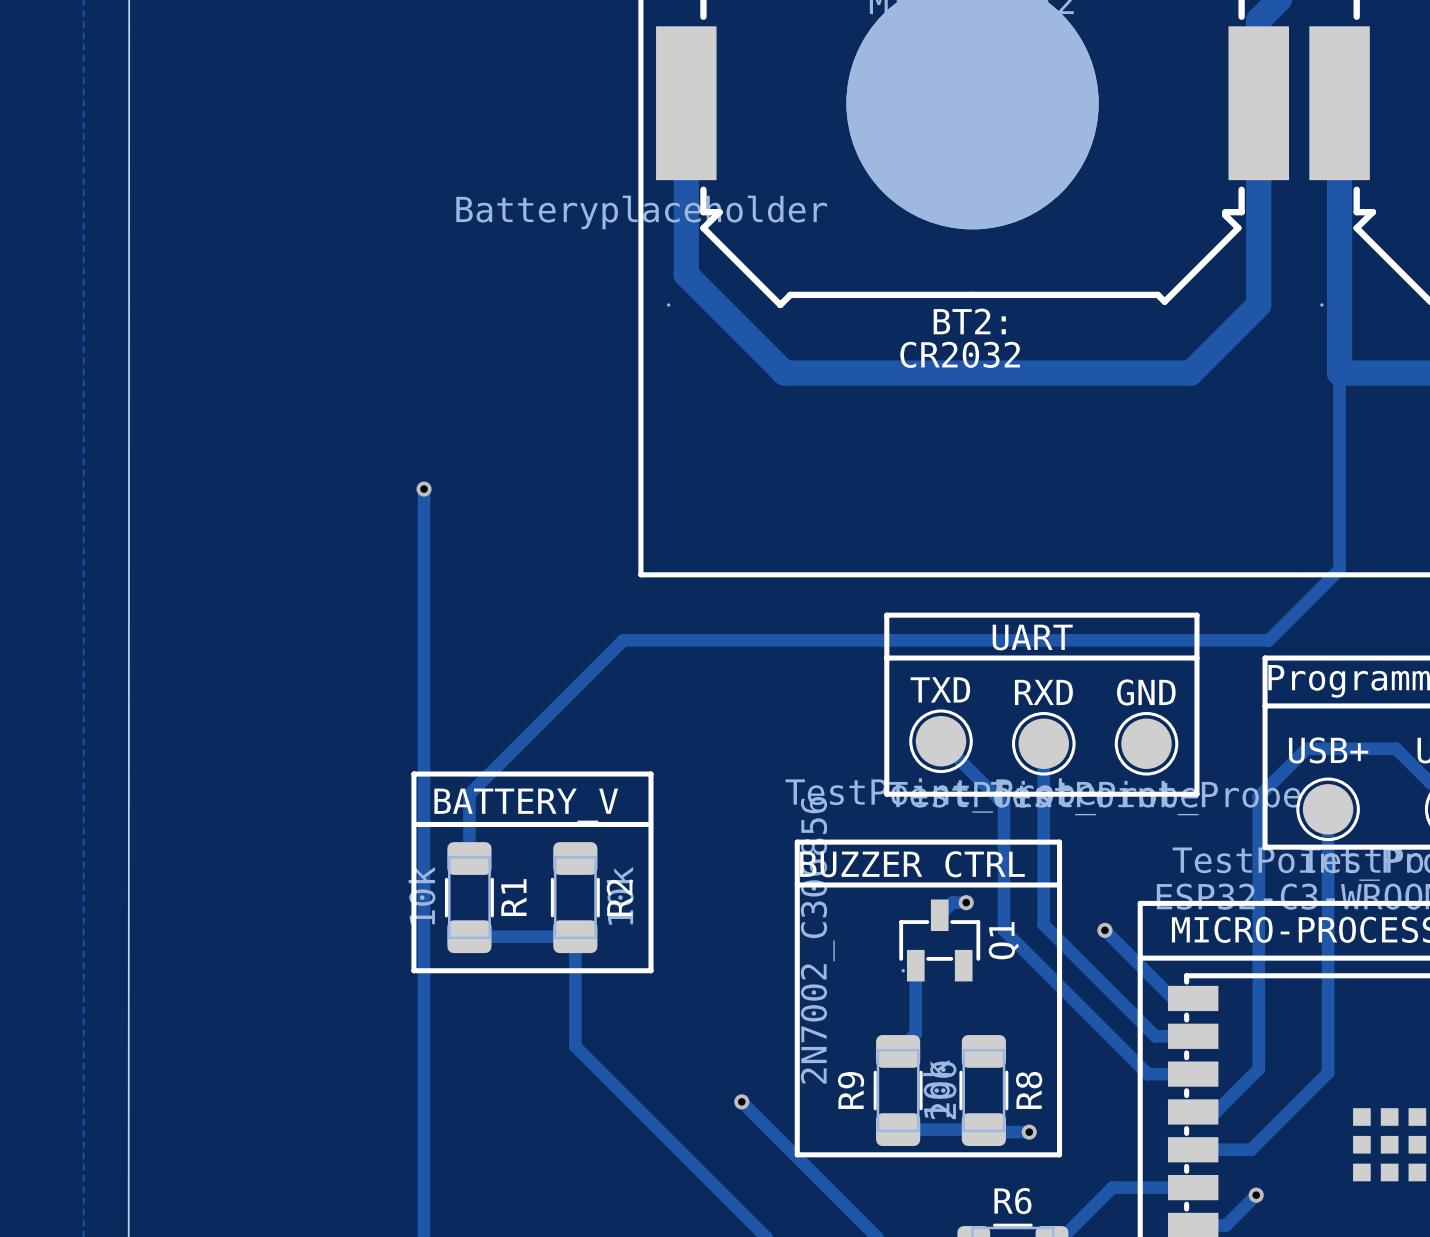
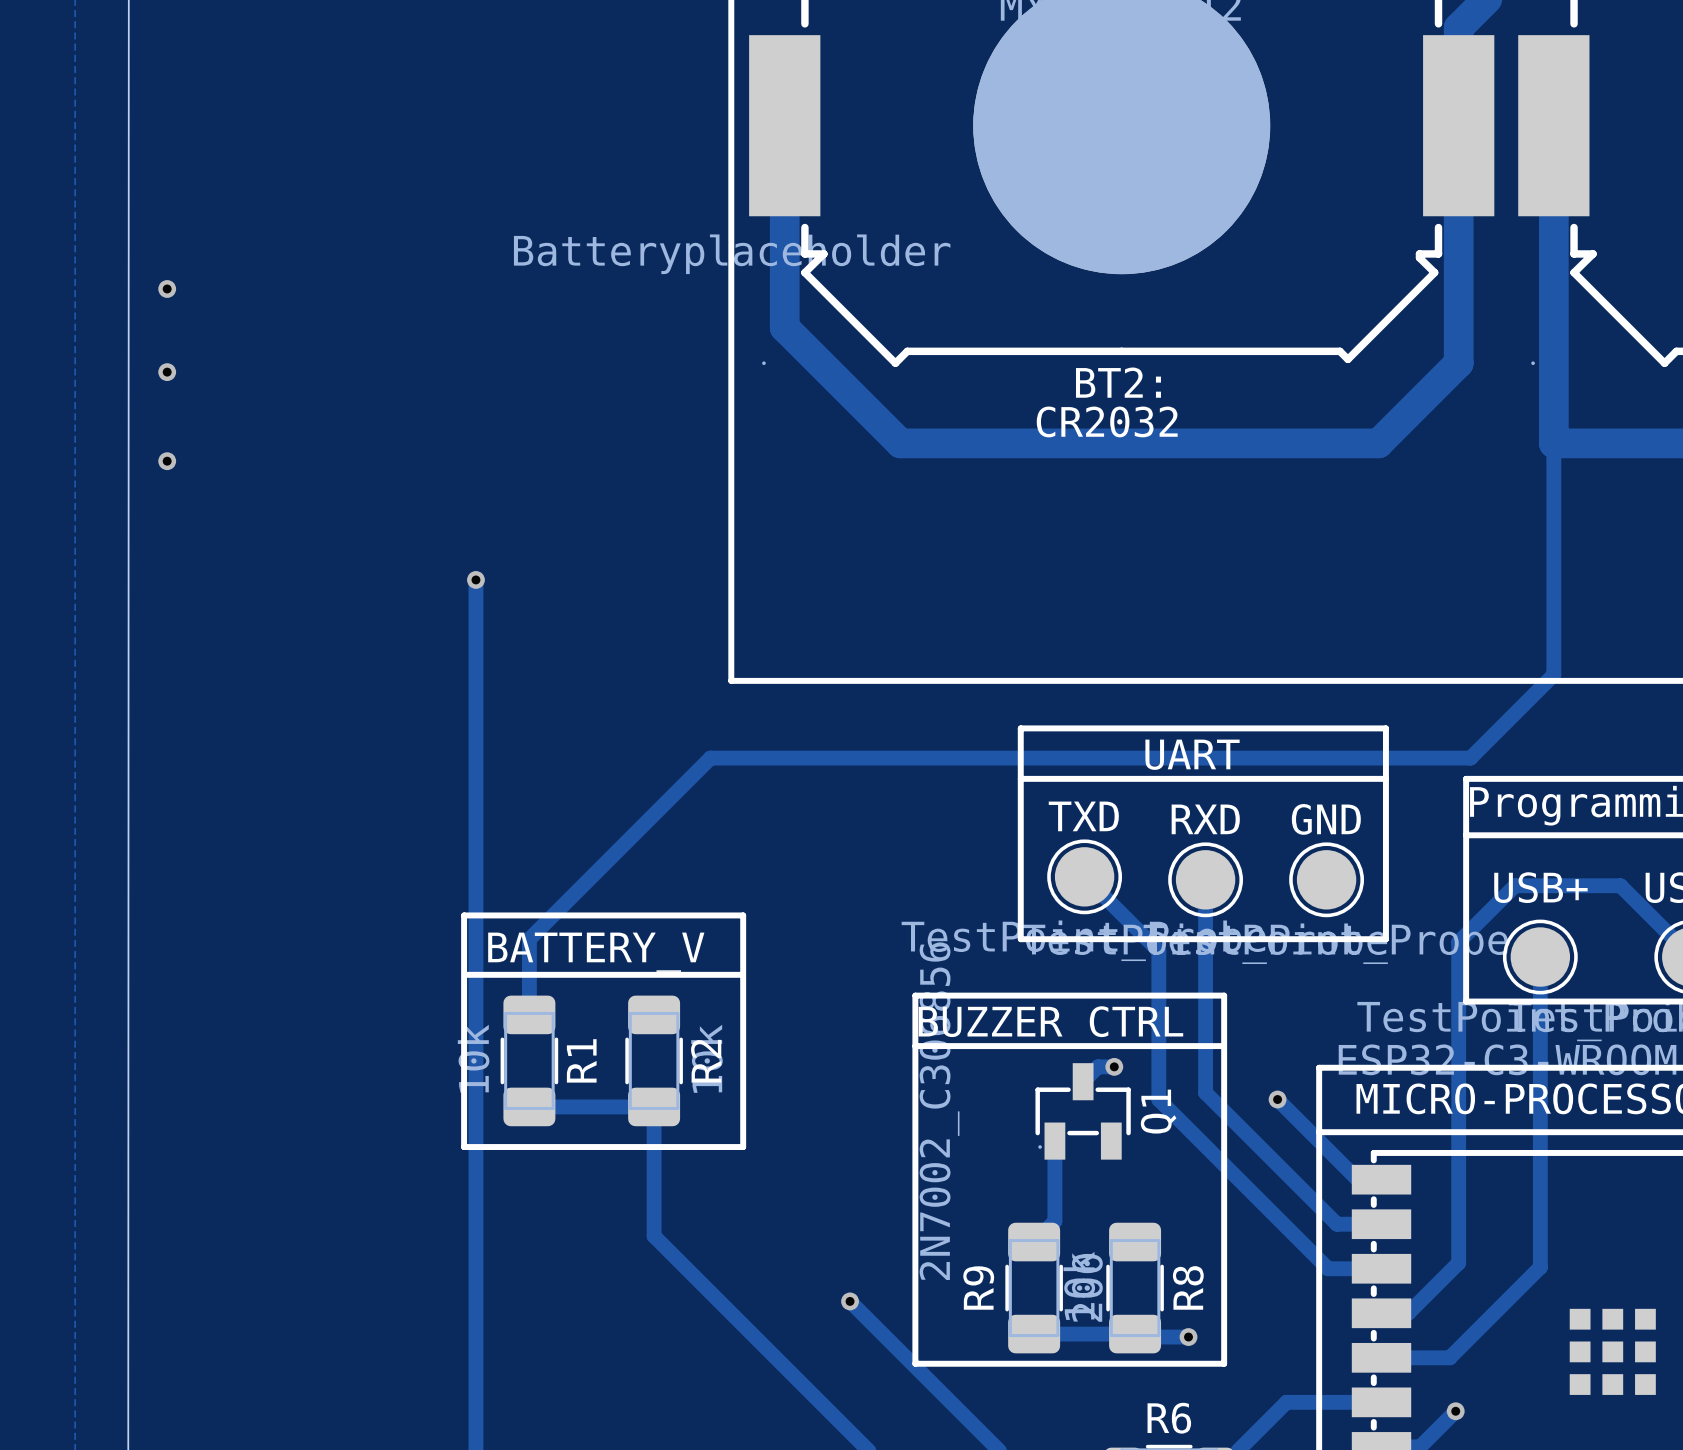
via: none -> (167, 288)
via: none -> (167, 372)
via: none -> (167, 461)

